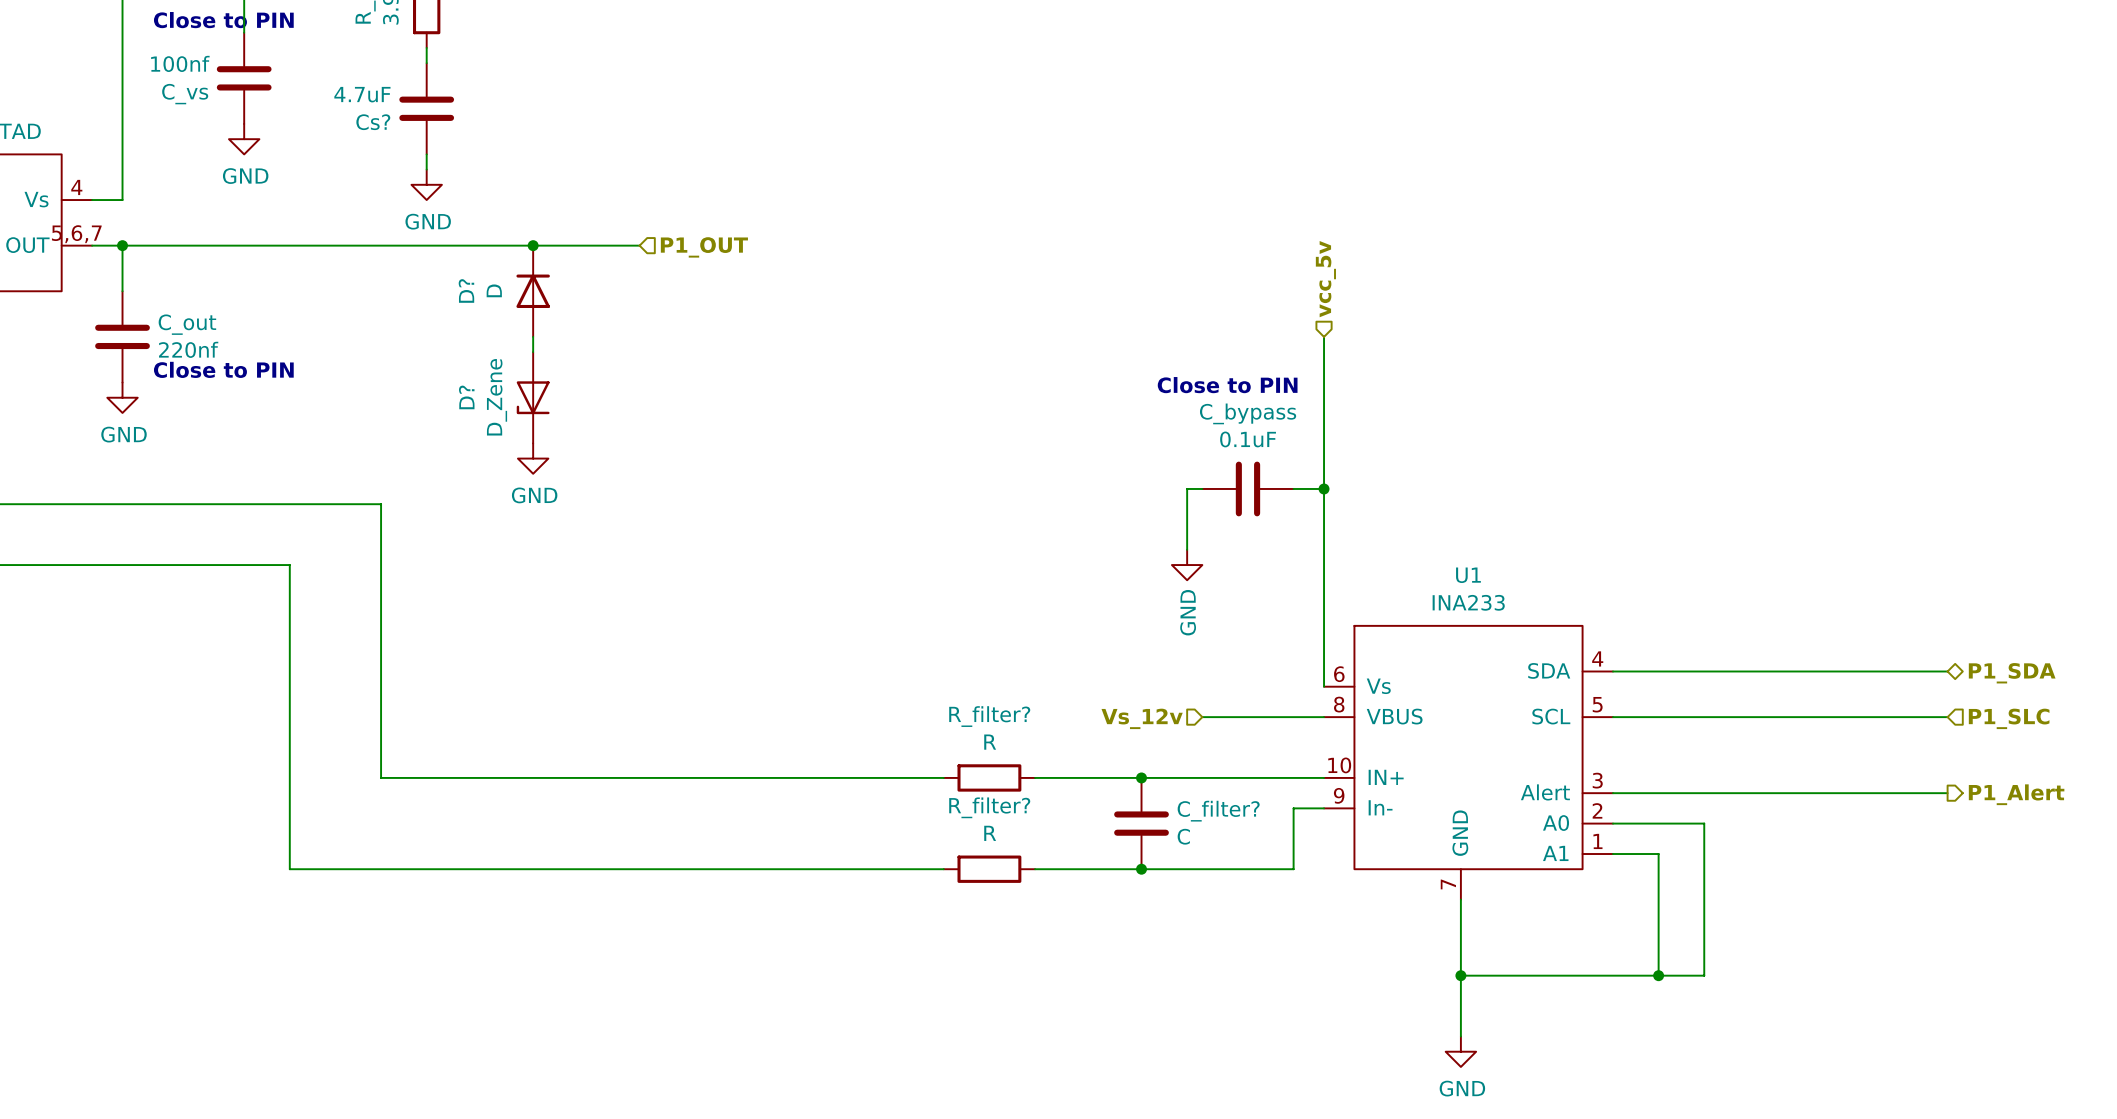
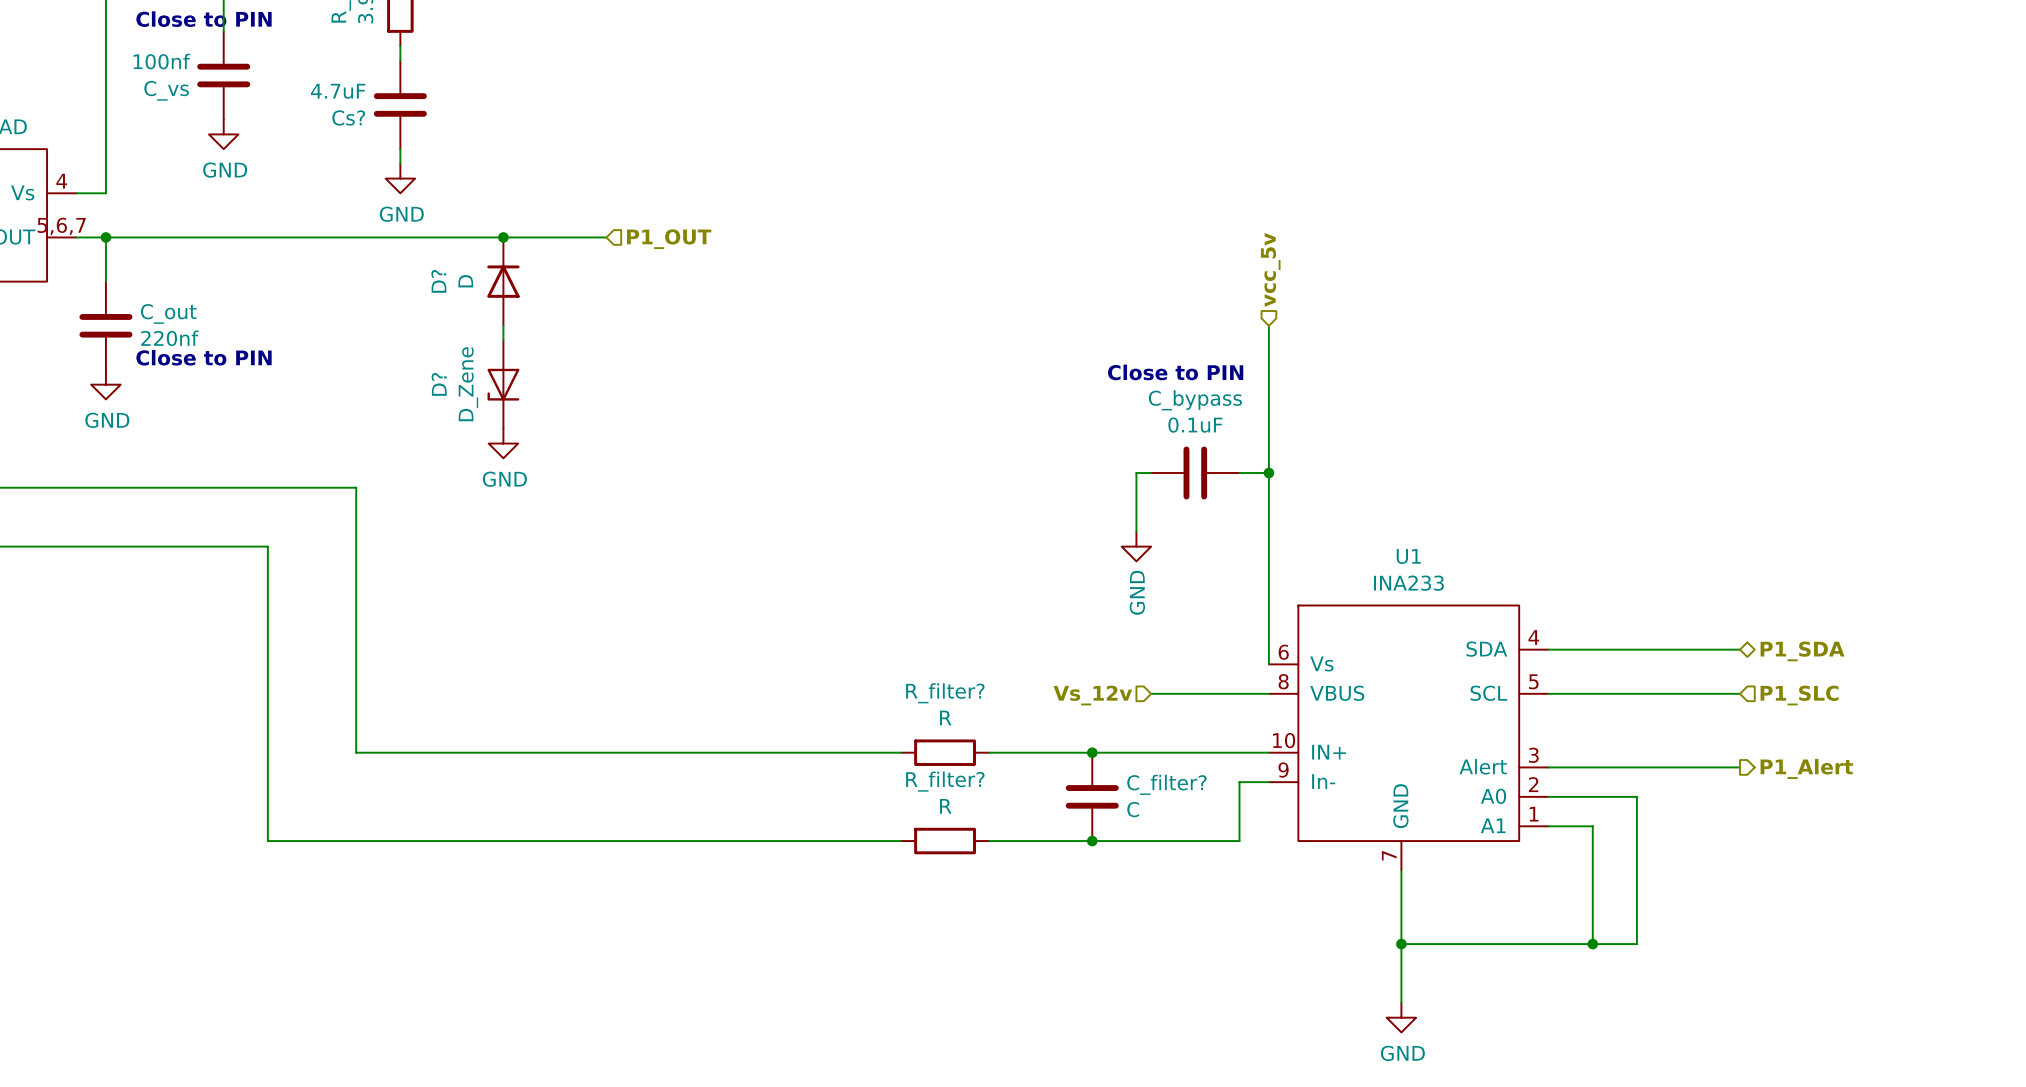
wire: (1810, 671) (1947, 671) -> none
hierarchical label position: P1_SDA (2012, 673) -> P1_SDA (1802, 651)
wire: (1810, 717) (1947, 717) -> none
hierarchical label position: P1_SLC (2009, 718) -> P1_SLC (1799, 695)
wire: (1810, 793) (1947, 793) -> none
hierarchical label position: P1_Alert (2016, 794) -> P1_Alert (1806, 768)

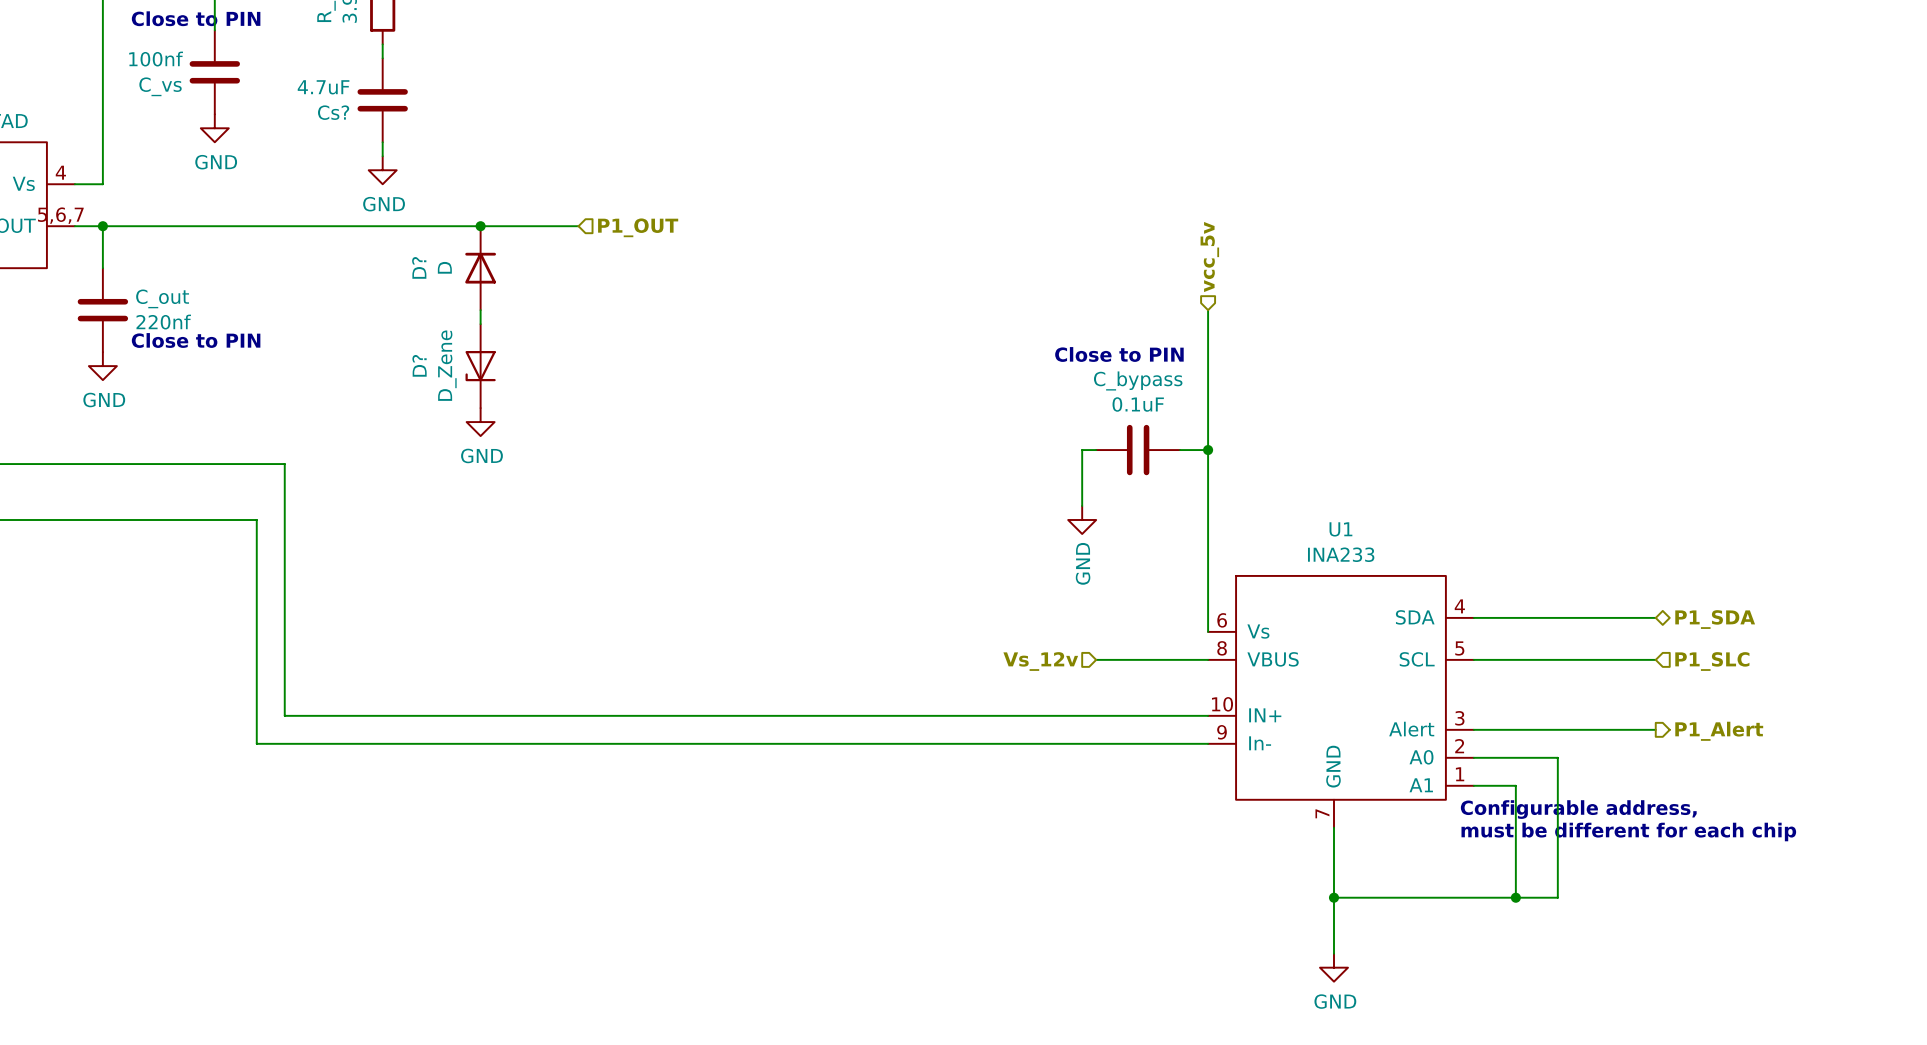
wire: (297, 487) (356, 487) (356, 752) -> (284, 464) (284, 715) (340, 715)
wire: none -> (858, 715) (942, 715)
R_filter?: R (945, 752) -> none
junction: (1092, 752) -> none
wire: (267, 782) (267, 841) (900, 841) -> (256, 743) (1180, 743)
wire: (1239, 782) (1239, 841) (989, 841) -> none
C_filter?: C (1092, 796) -> none
R_filter?: R (945, 841) -> none
junction: (1092, 841) -> none
text: none -> Configurable address, (1578, 809)
text: none -> must be different for each chip (1628, 832)

